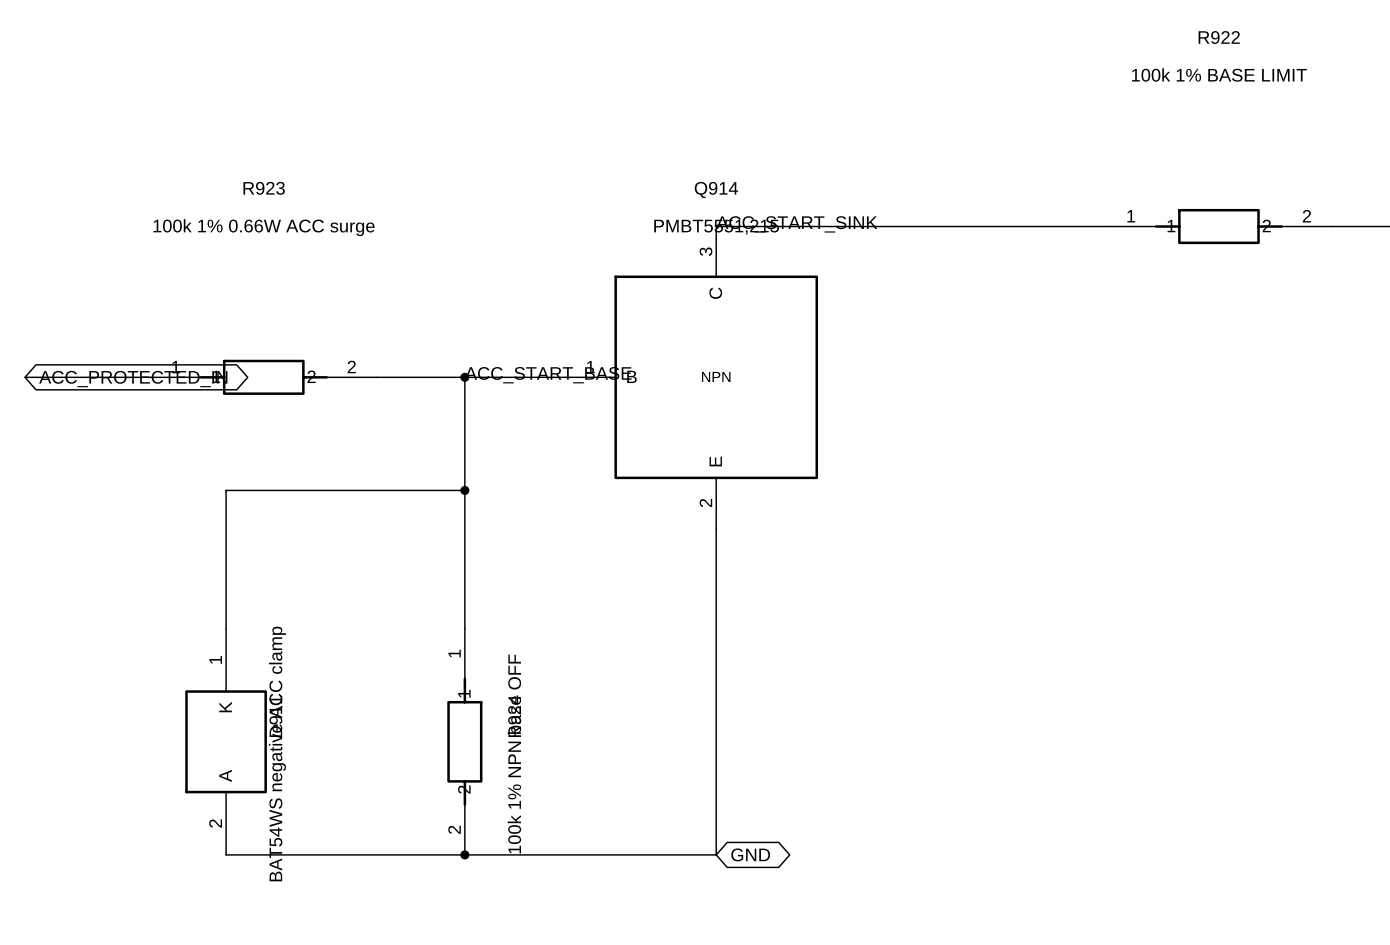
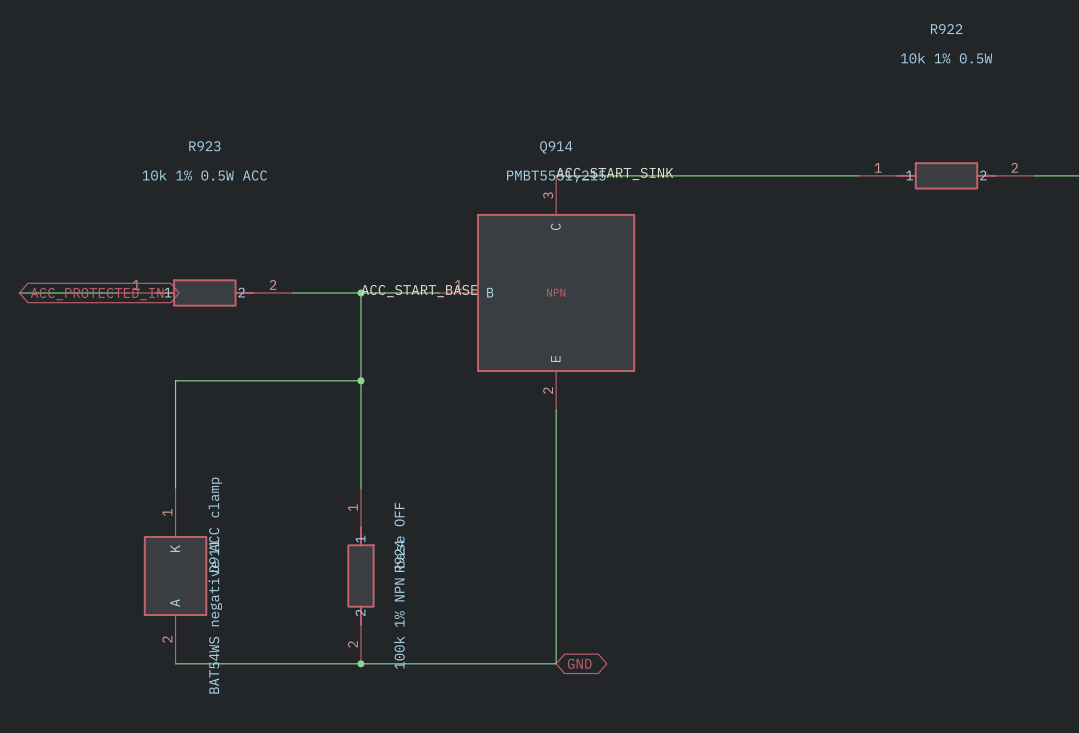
R922 value: 100k 1% BASE LIMIT (1219, 74) -> 10k 1% 0.5W (946, 58)
R923 value: 100k 1% 0.66W ACC surge (264, 227) -> 10k 1% 0.5W ACC (204, 175)

